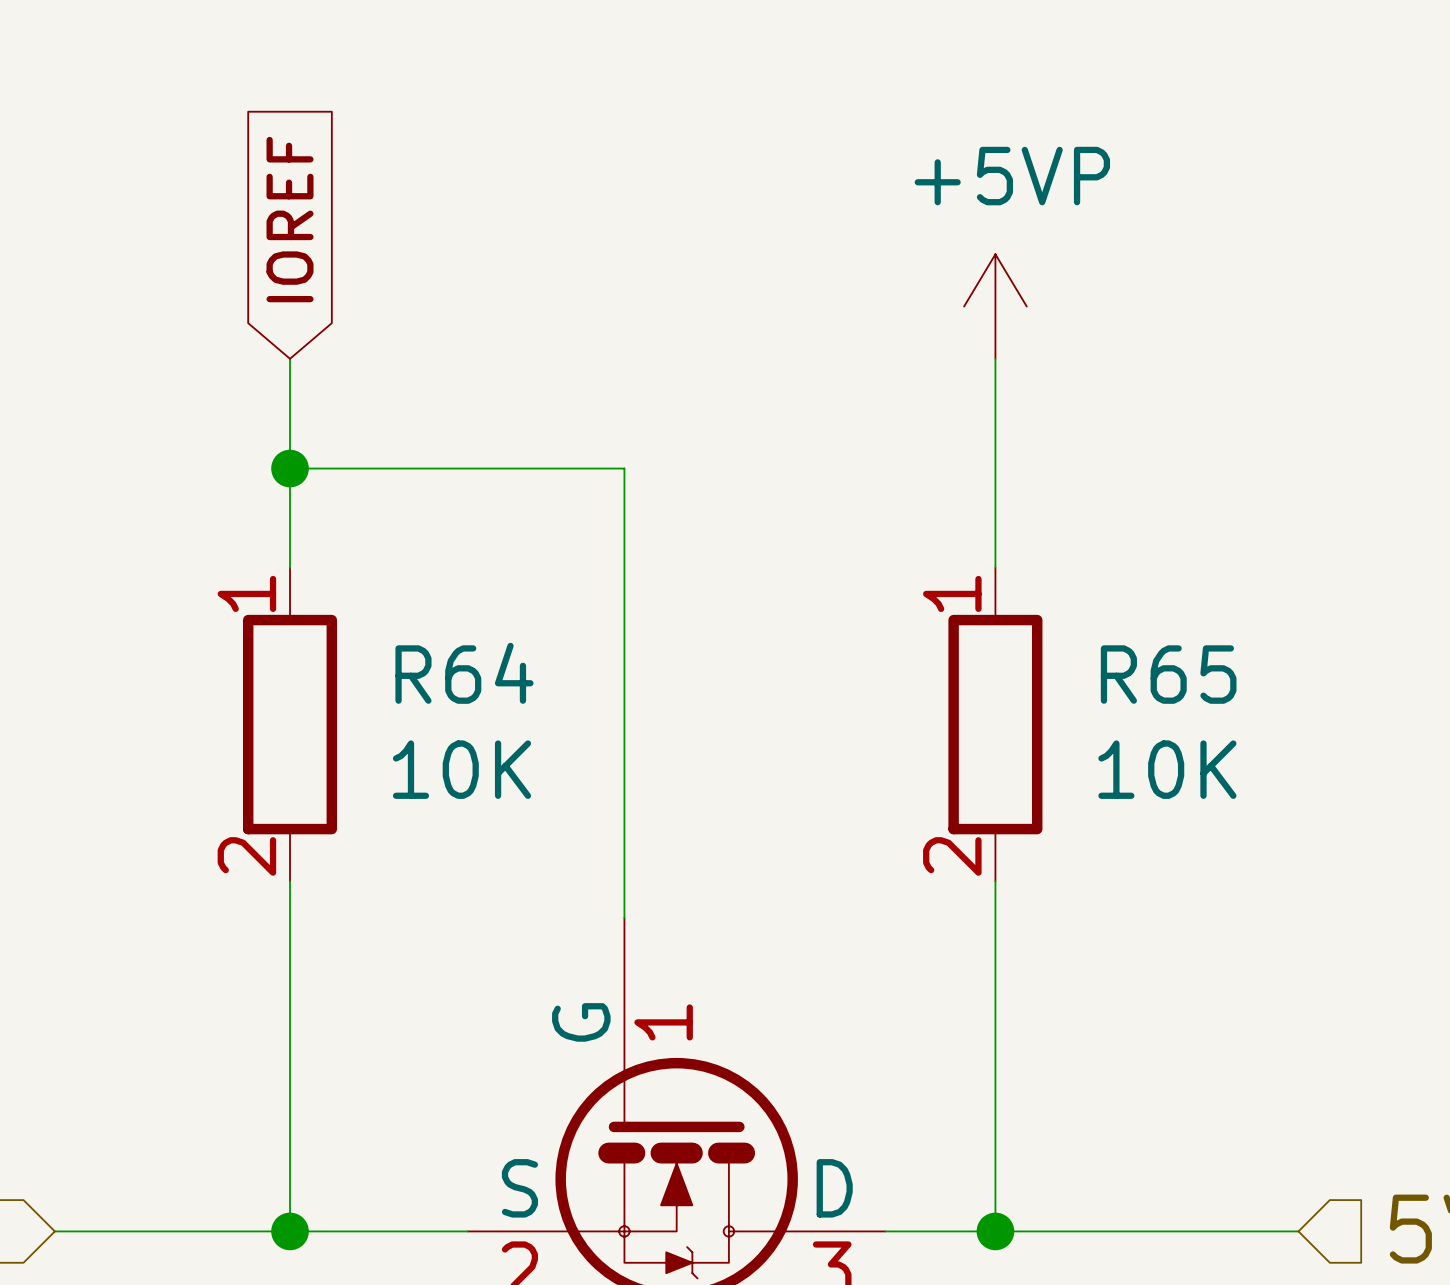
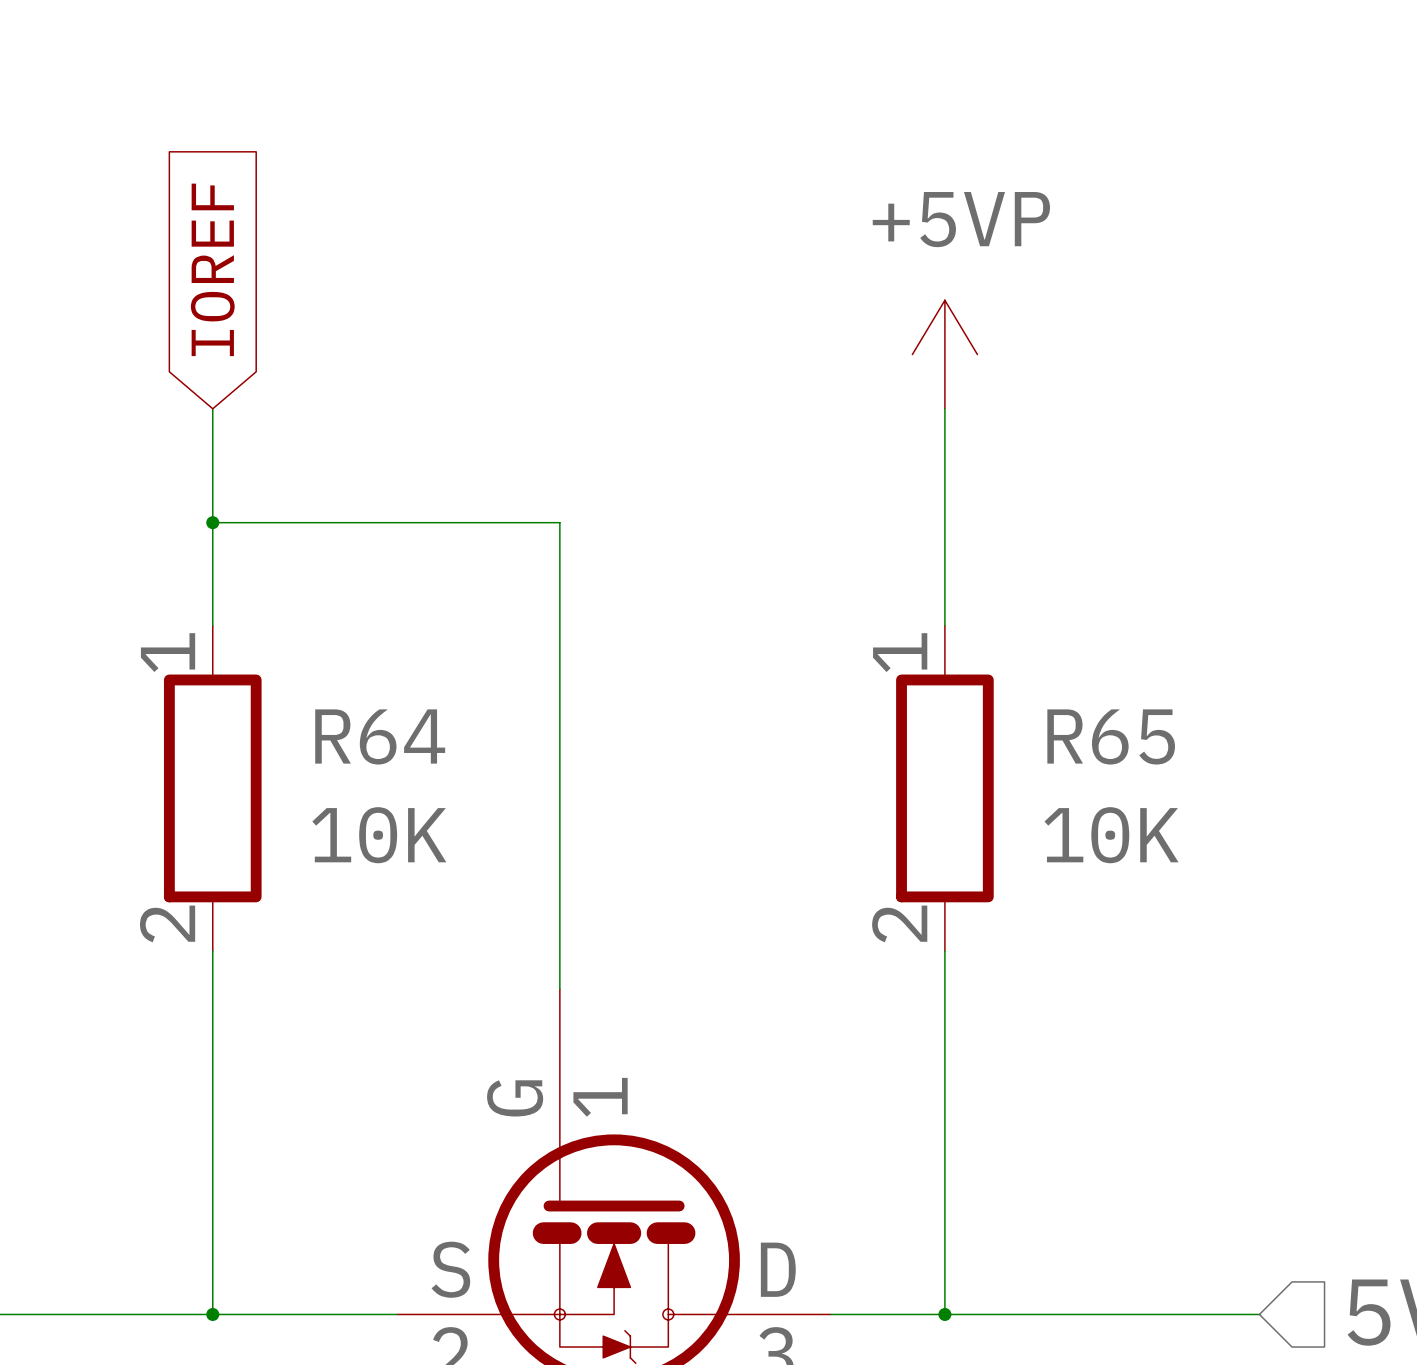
junction size: [271, 449, 309, 488] -> [206, 516, 220, 530]
junction size: [271, 1212, 309, 1251] -> [206, 1307, 220, 1321]
junction size: [976, 1212, 1015, 1251] -> [938, 1307, 952, 1321]

